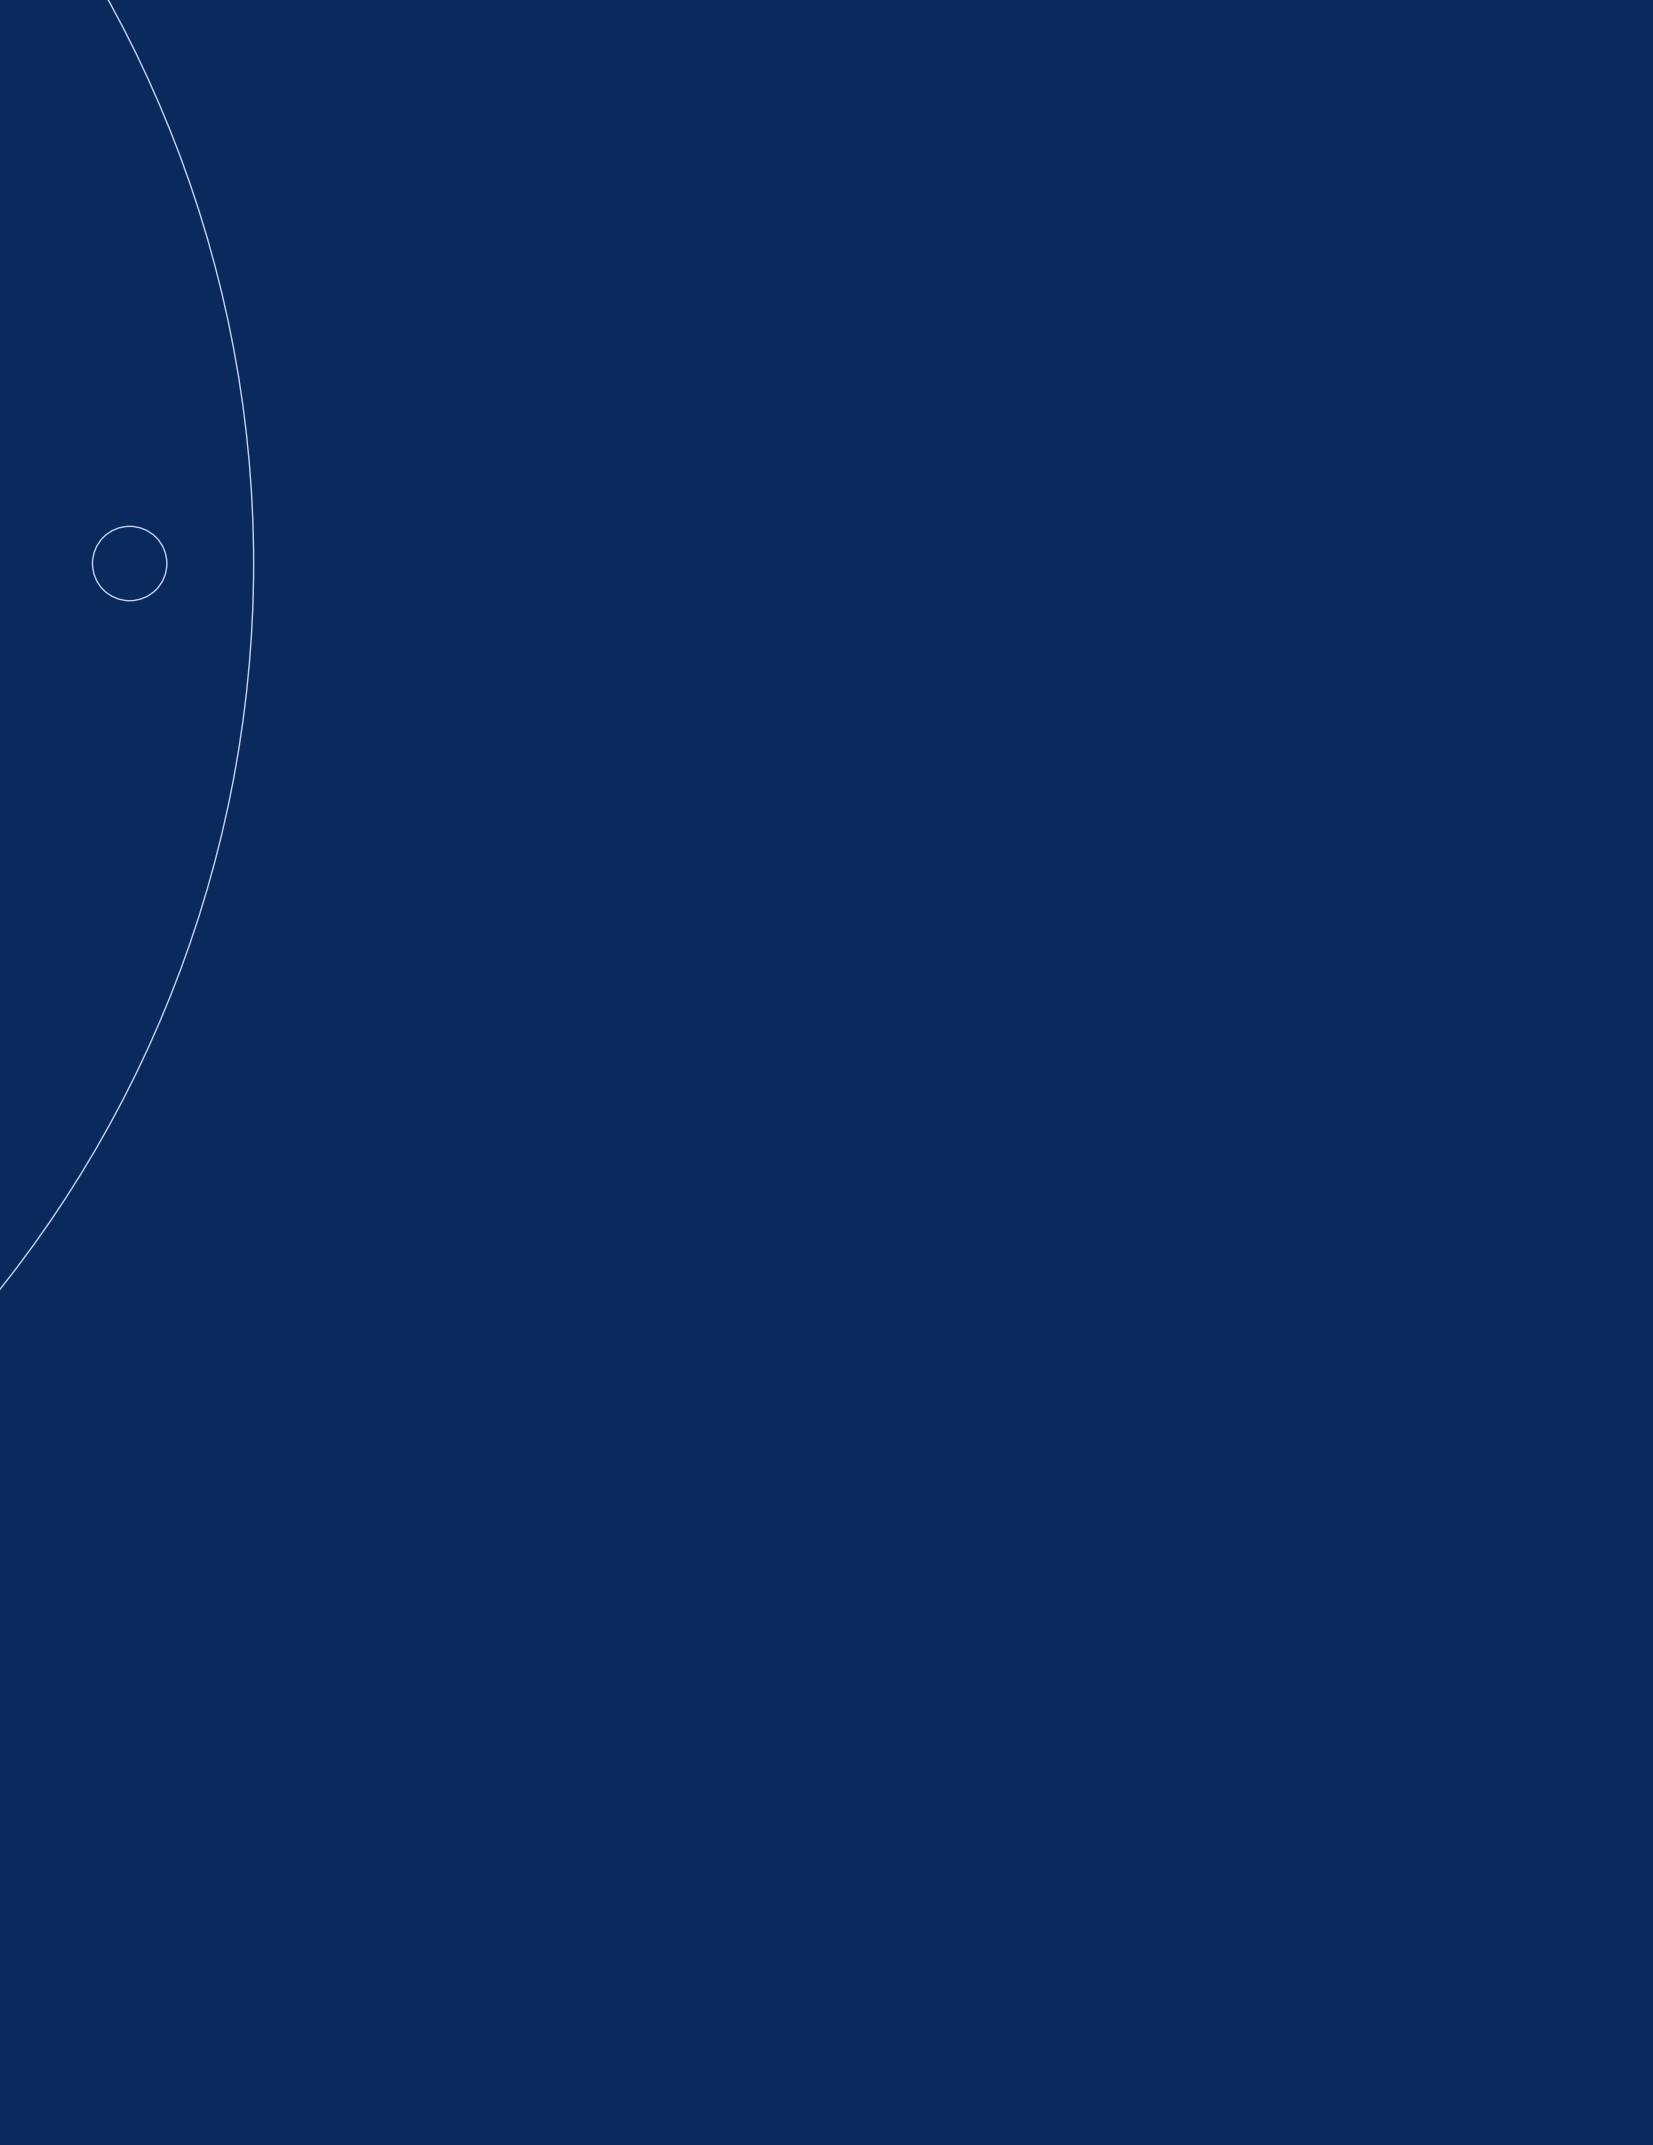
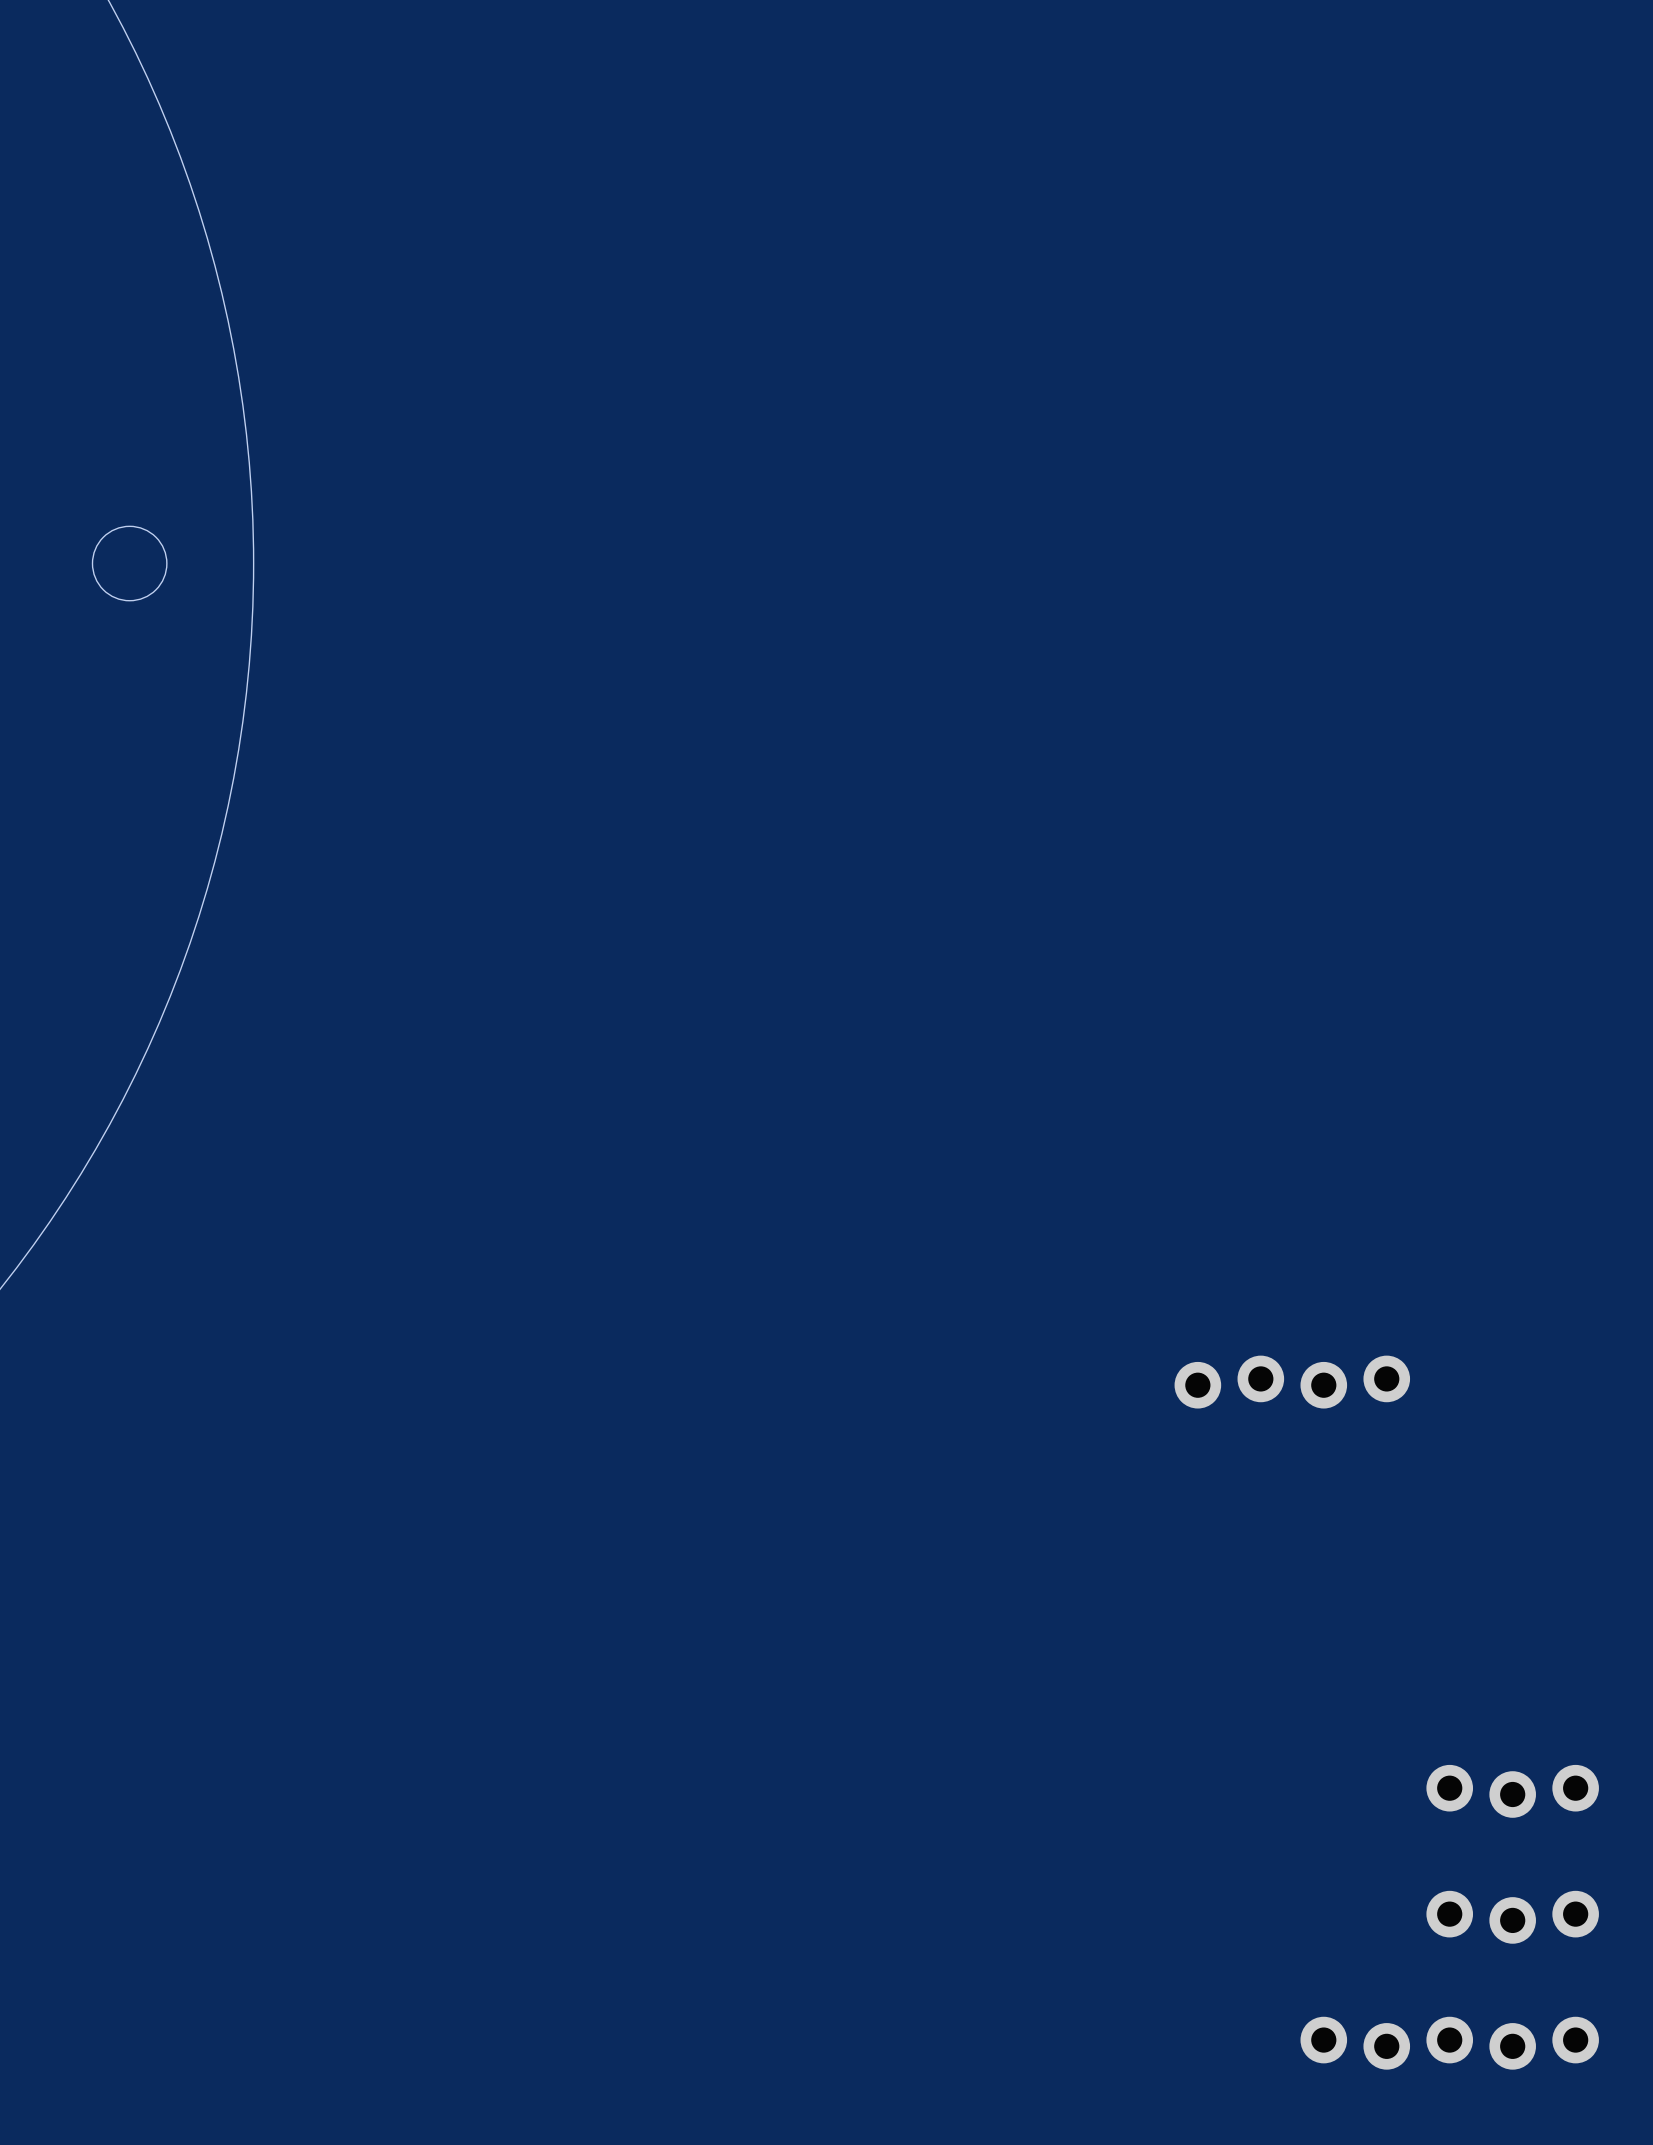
part: none -> (1292, 1382)
part: none -> (1512, 1791)
part: none -> (1512, 1917)
part: none -> (1449, 2043)

